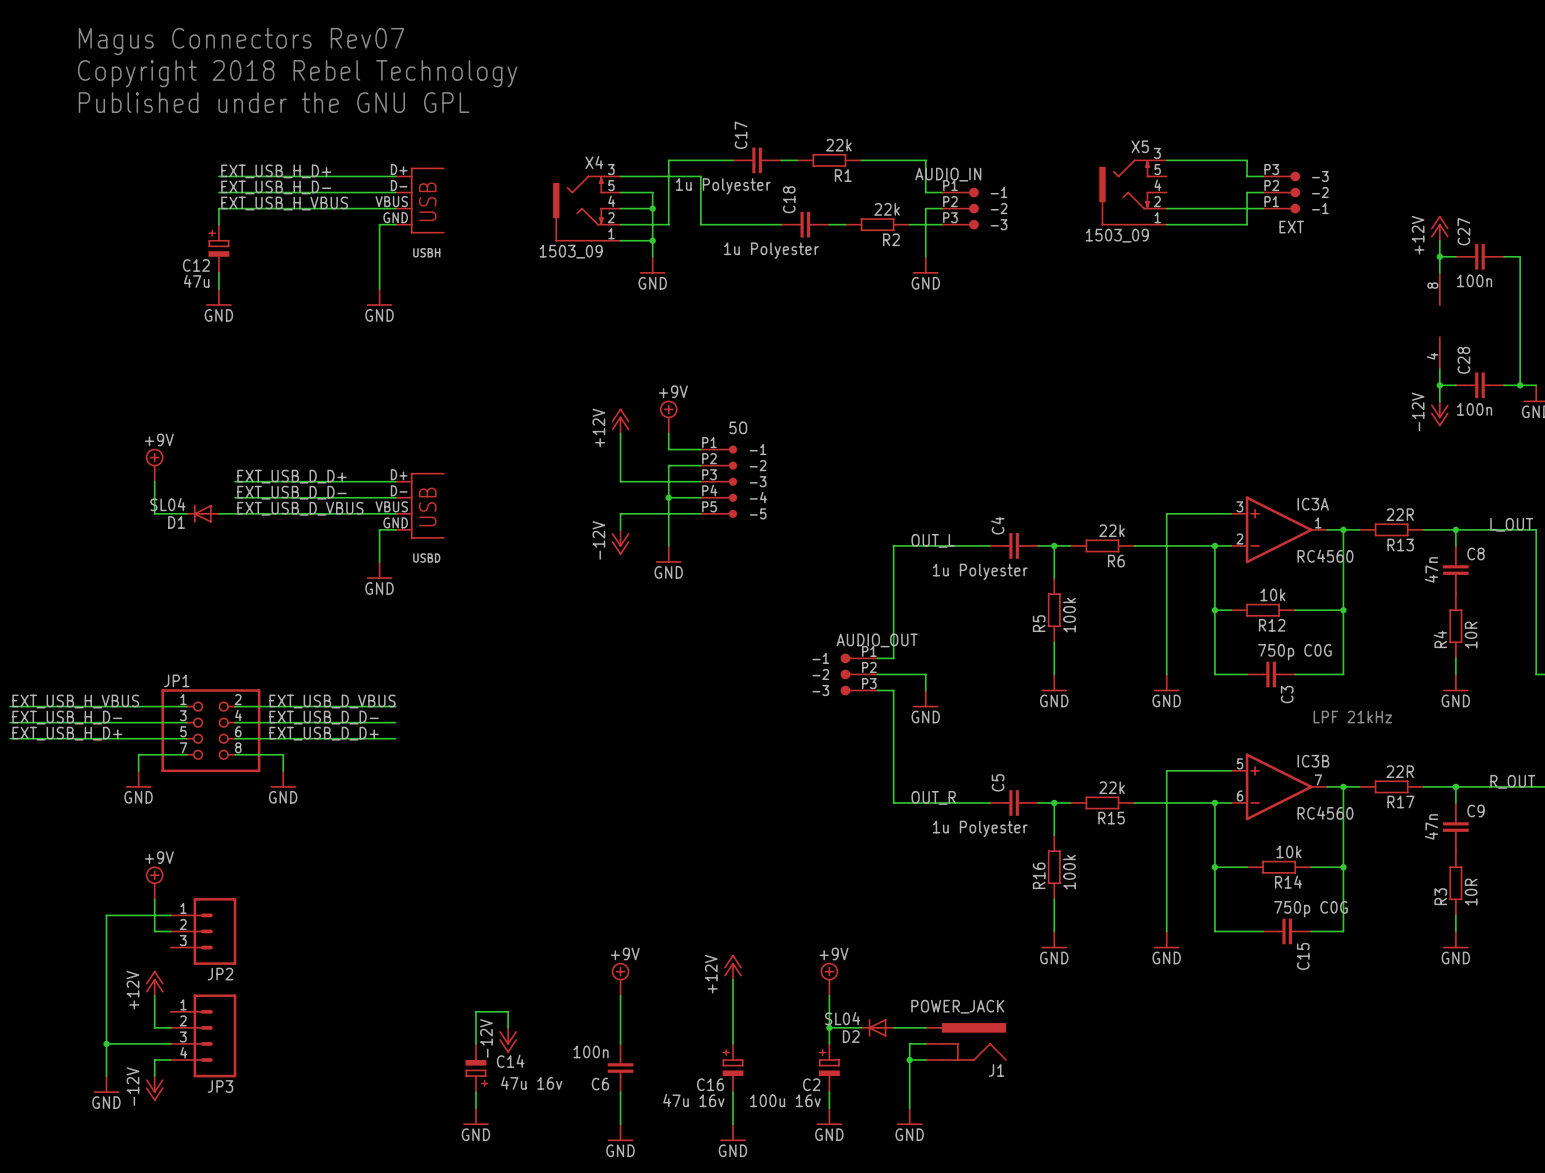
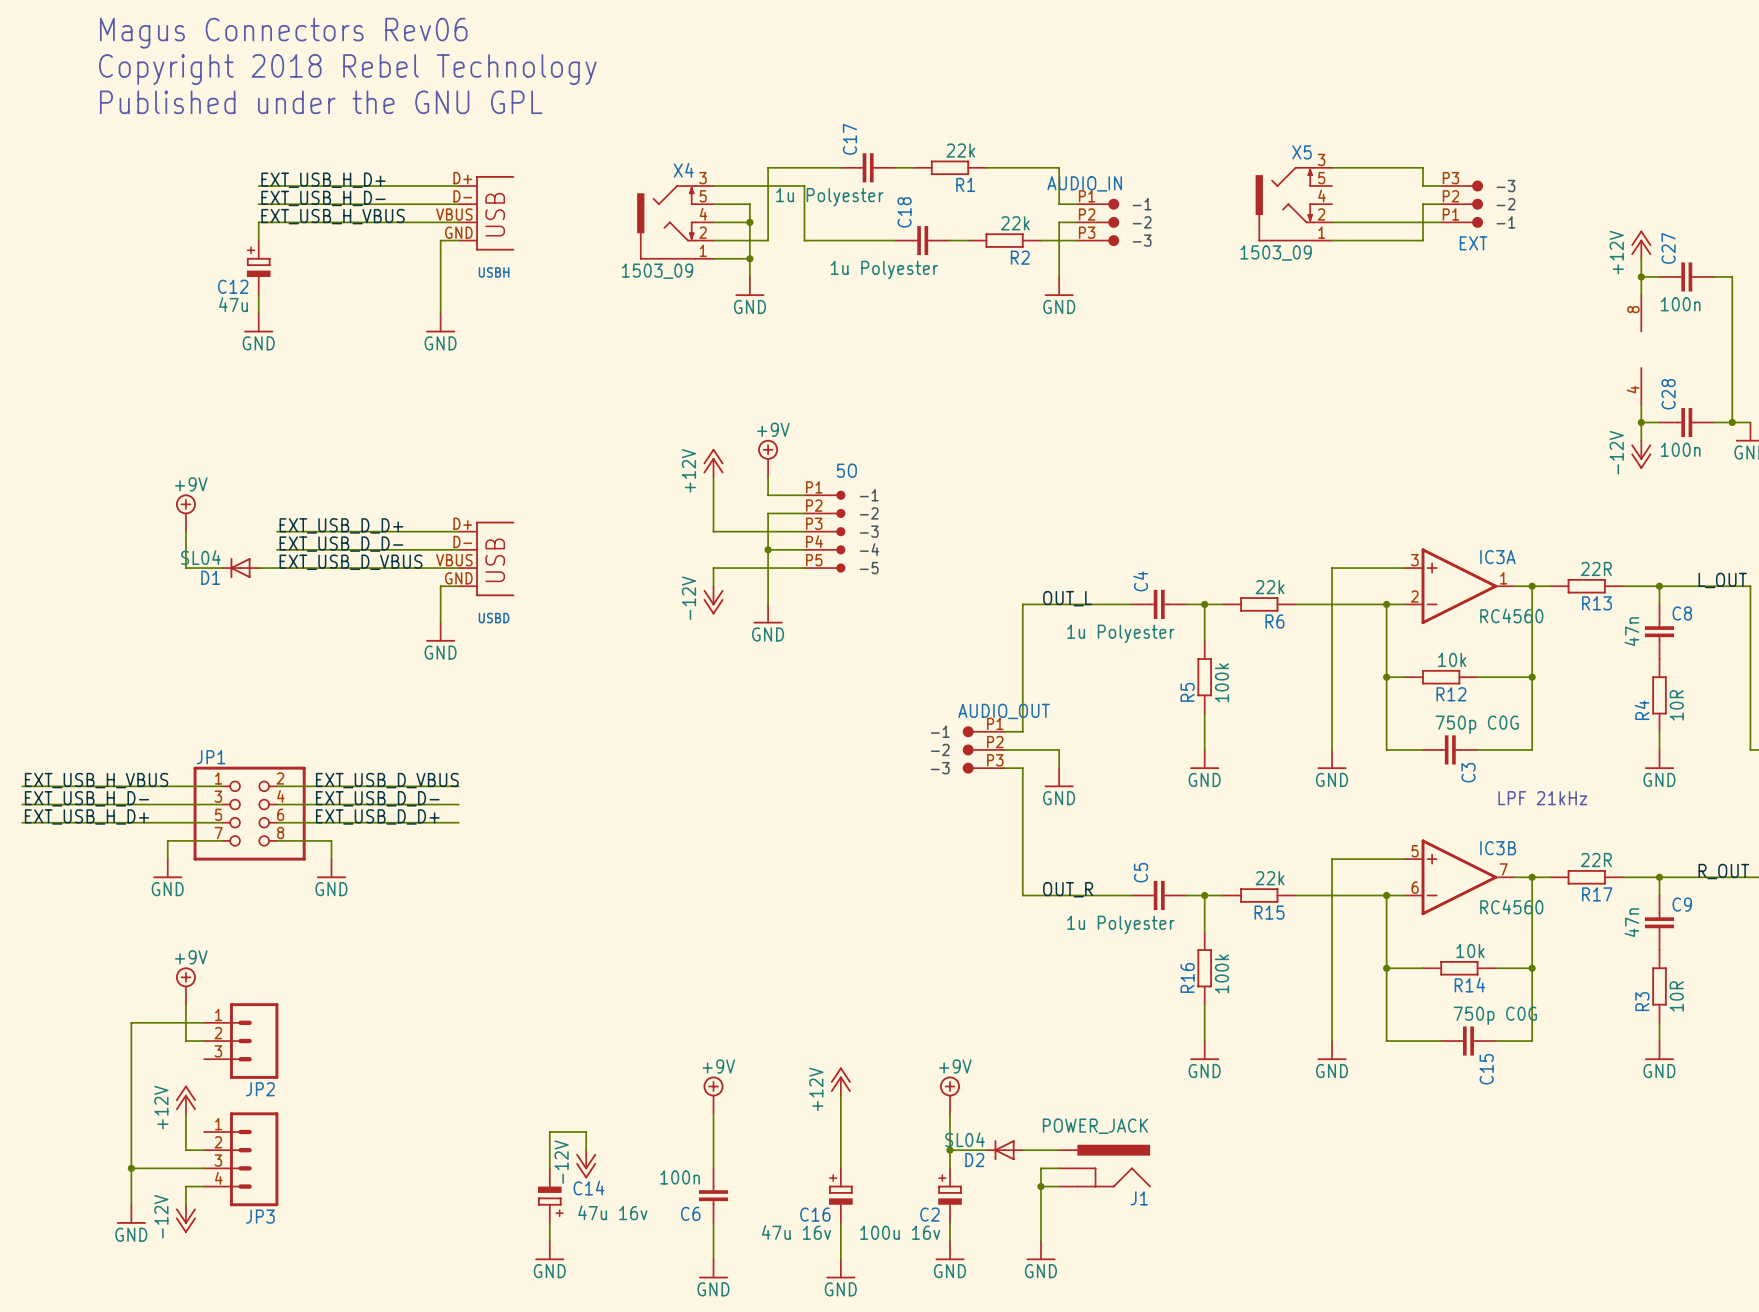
text: Magus Connectors Rev07 (241, 41) -> Magus Connectors Rev06 (283, 33)

